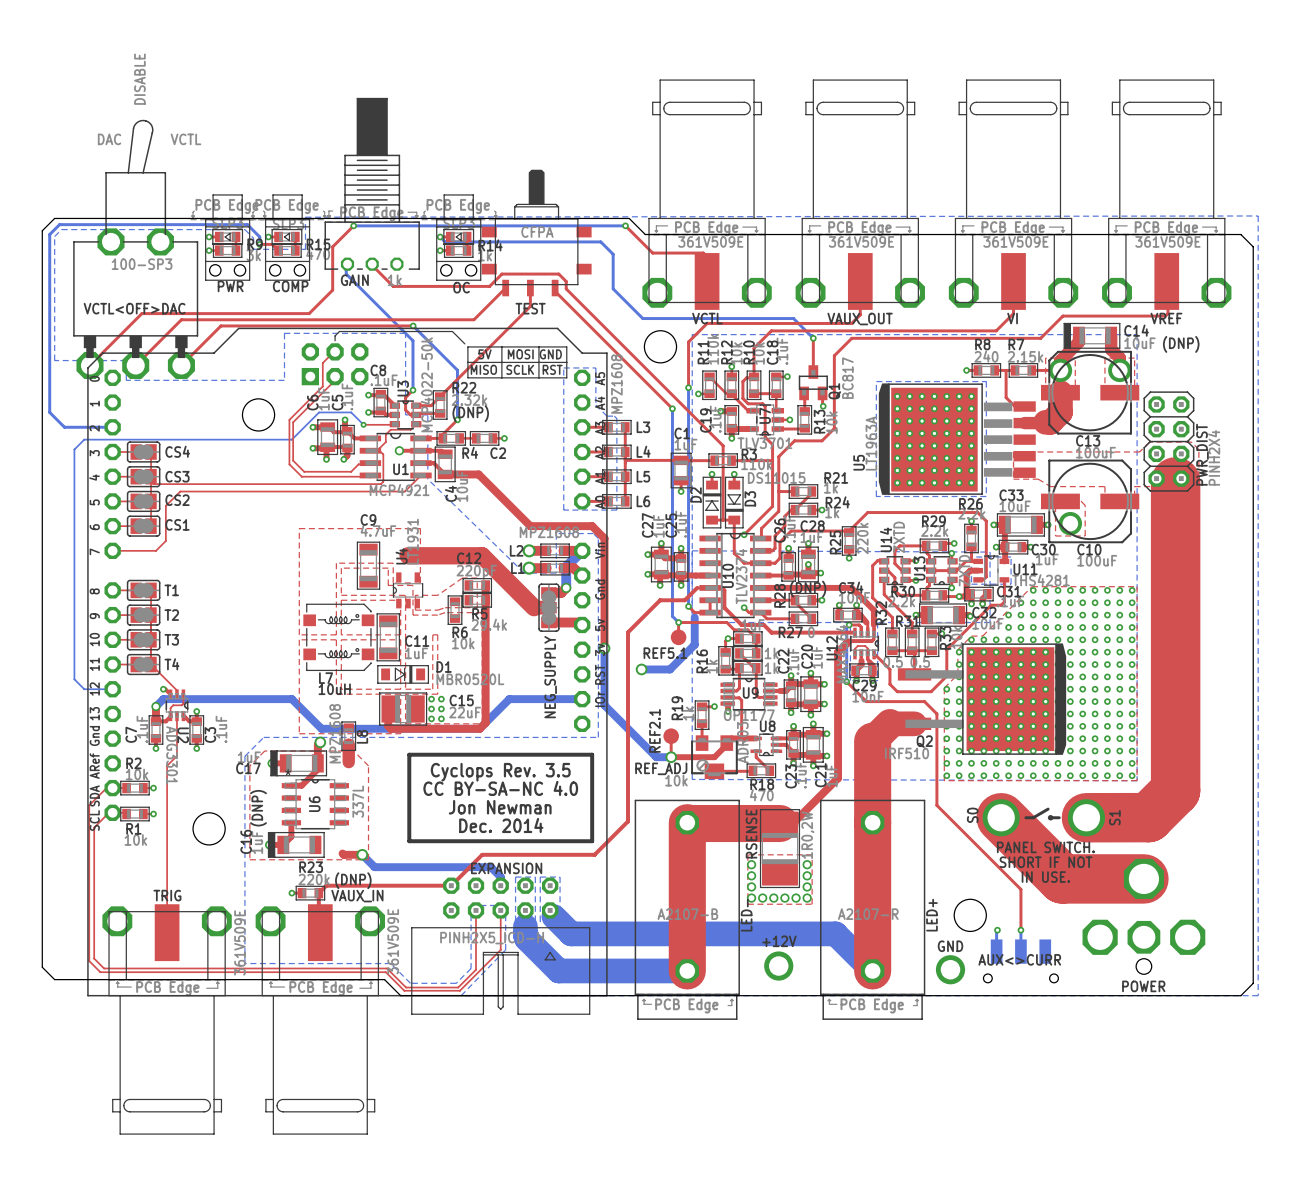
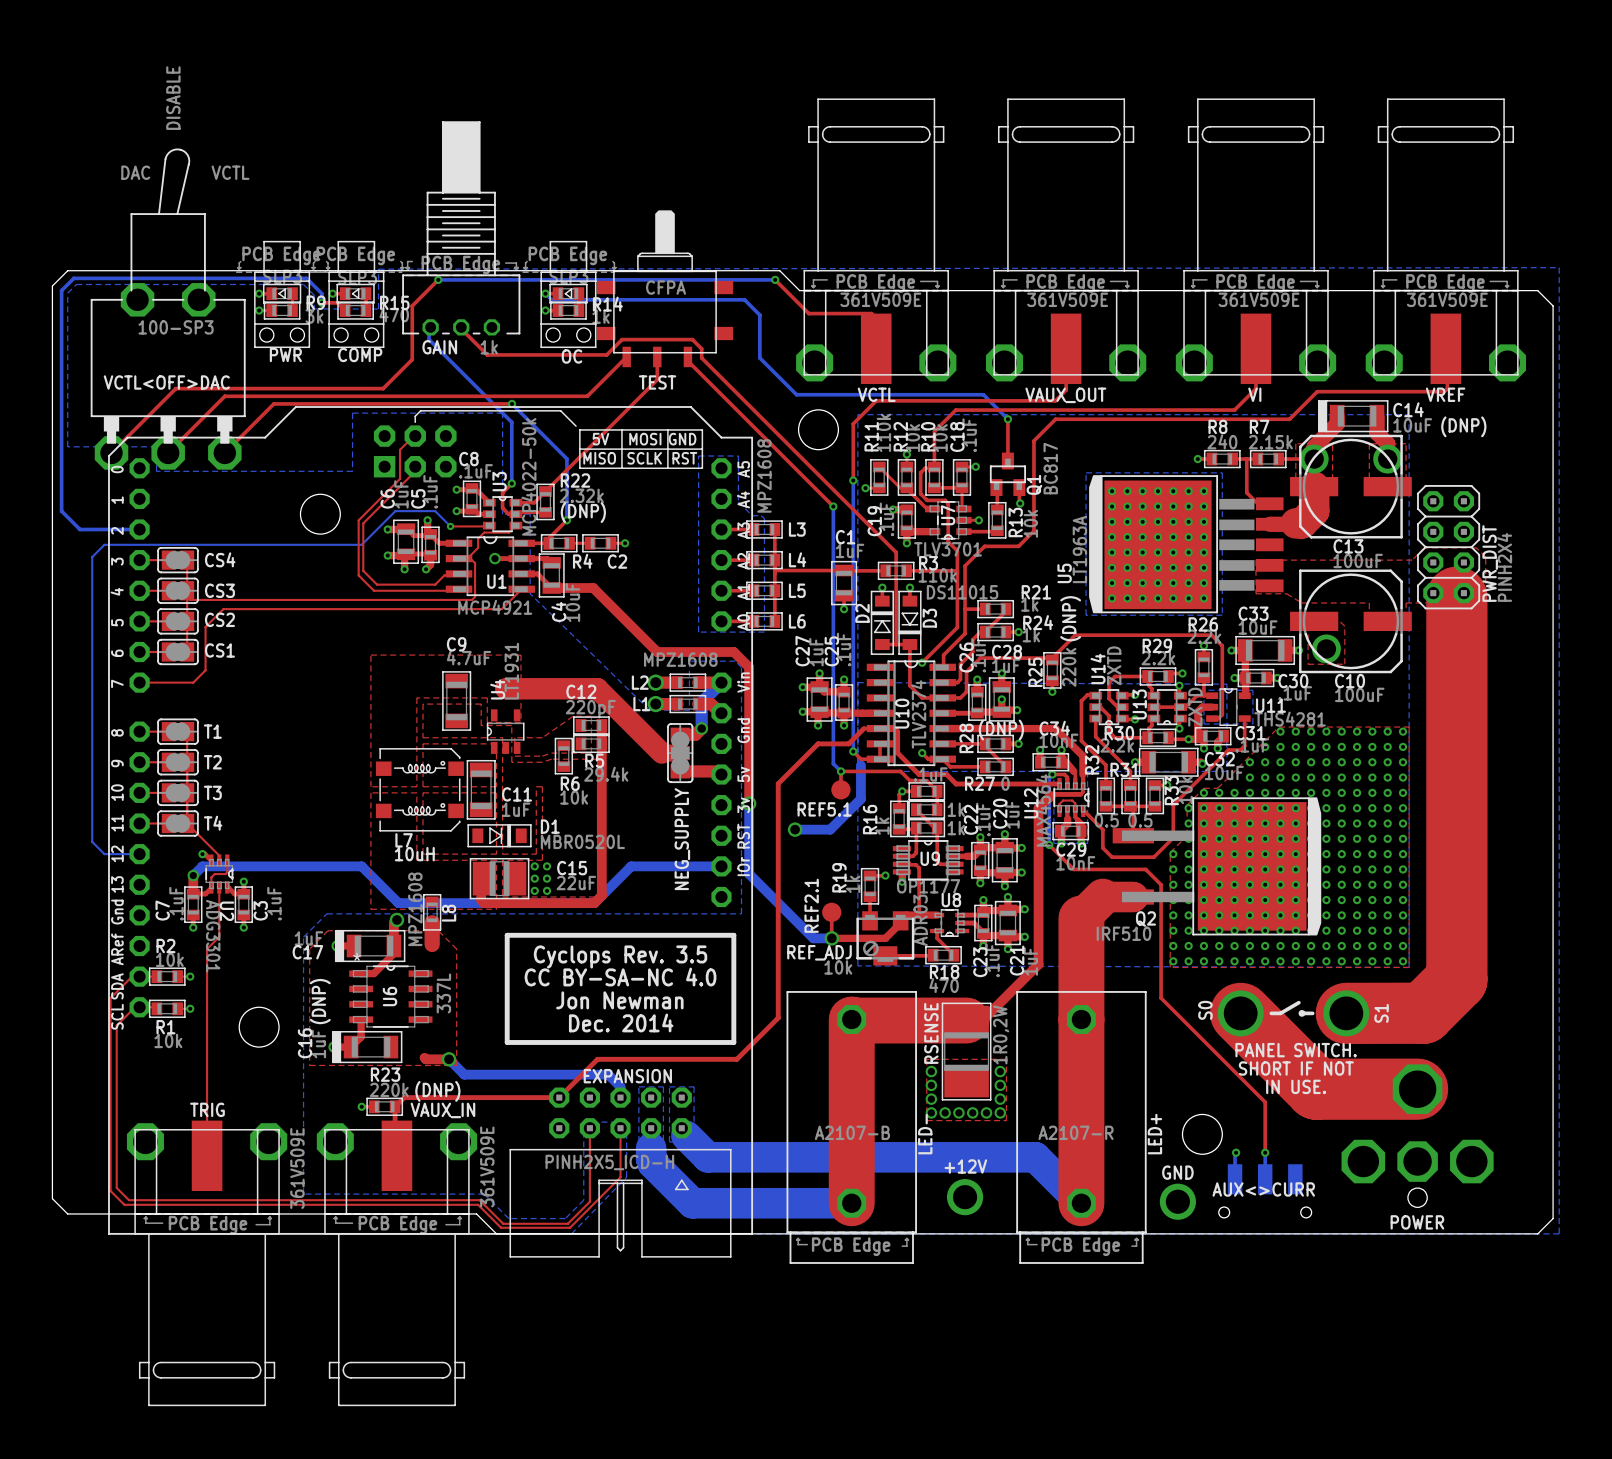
text: none -> (DNP) (1070, 618)

